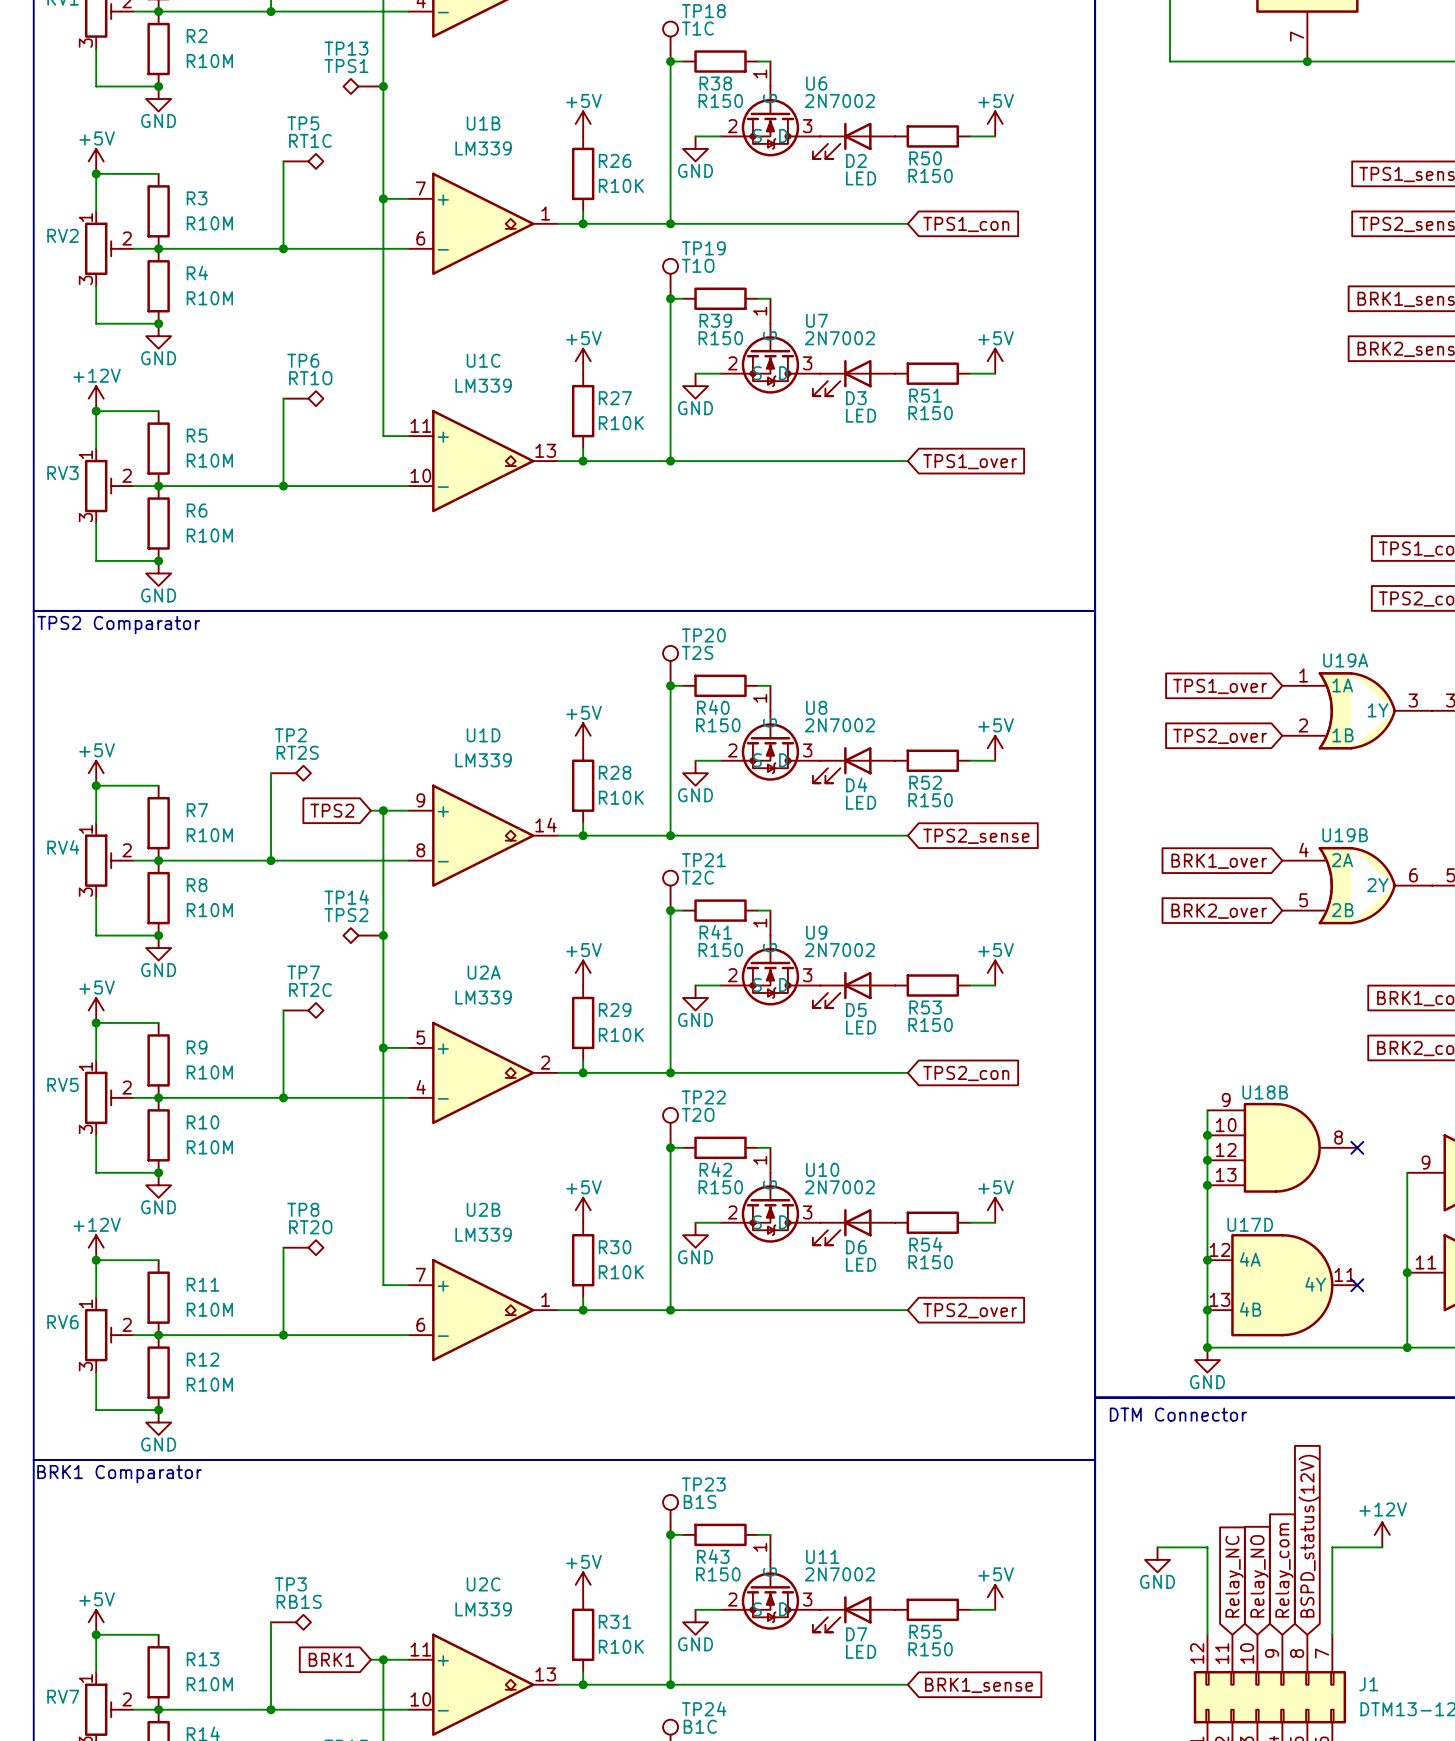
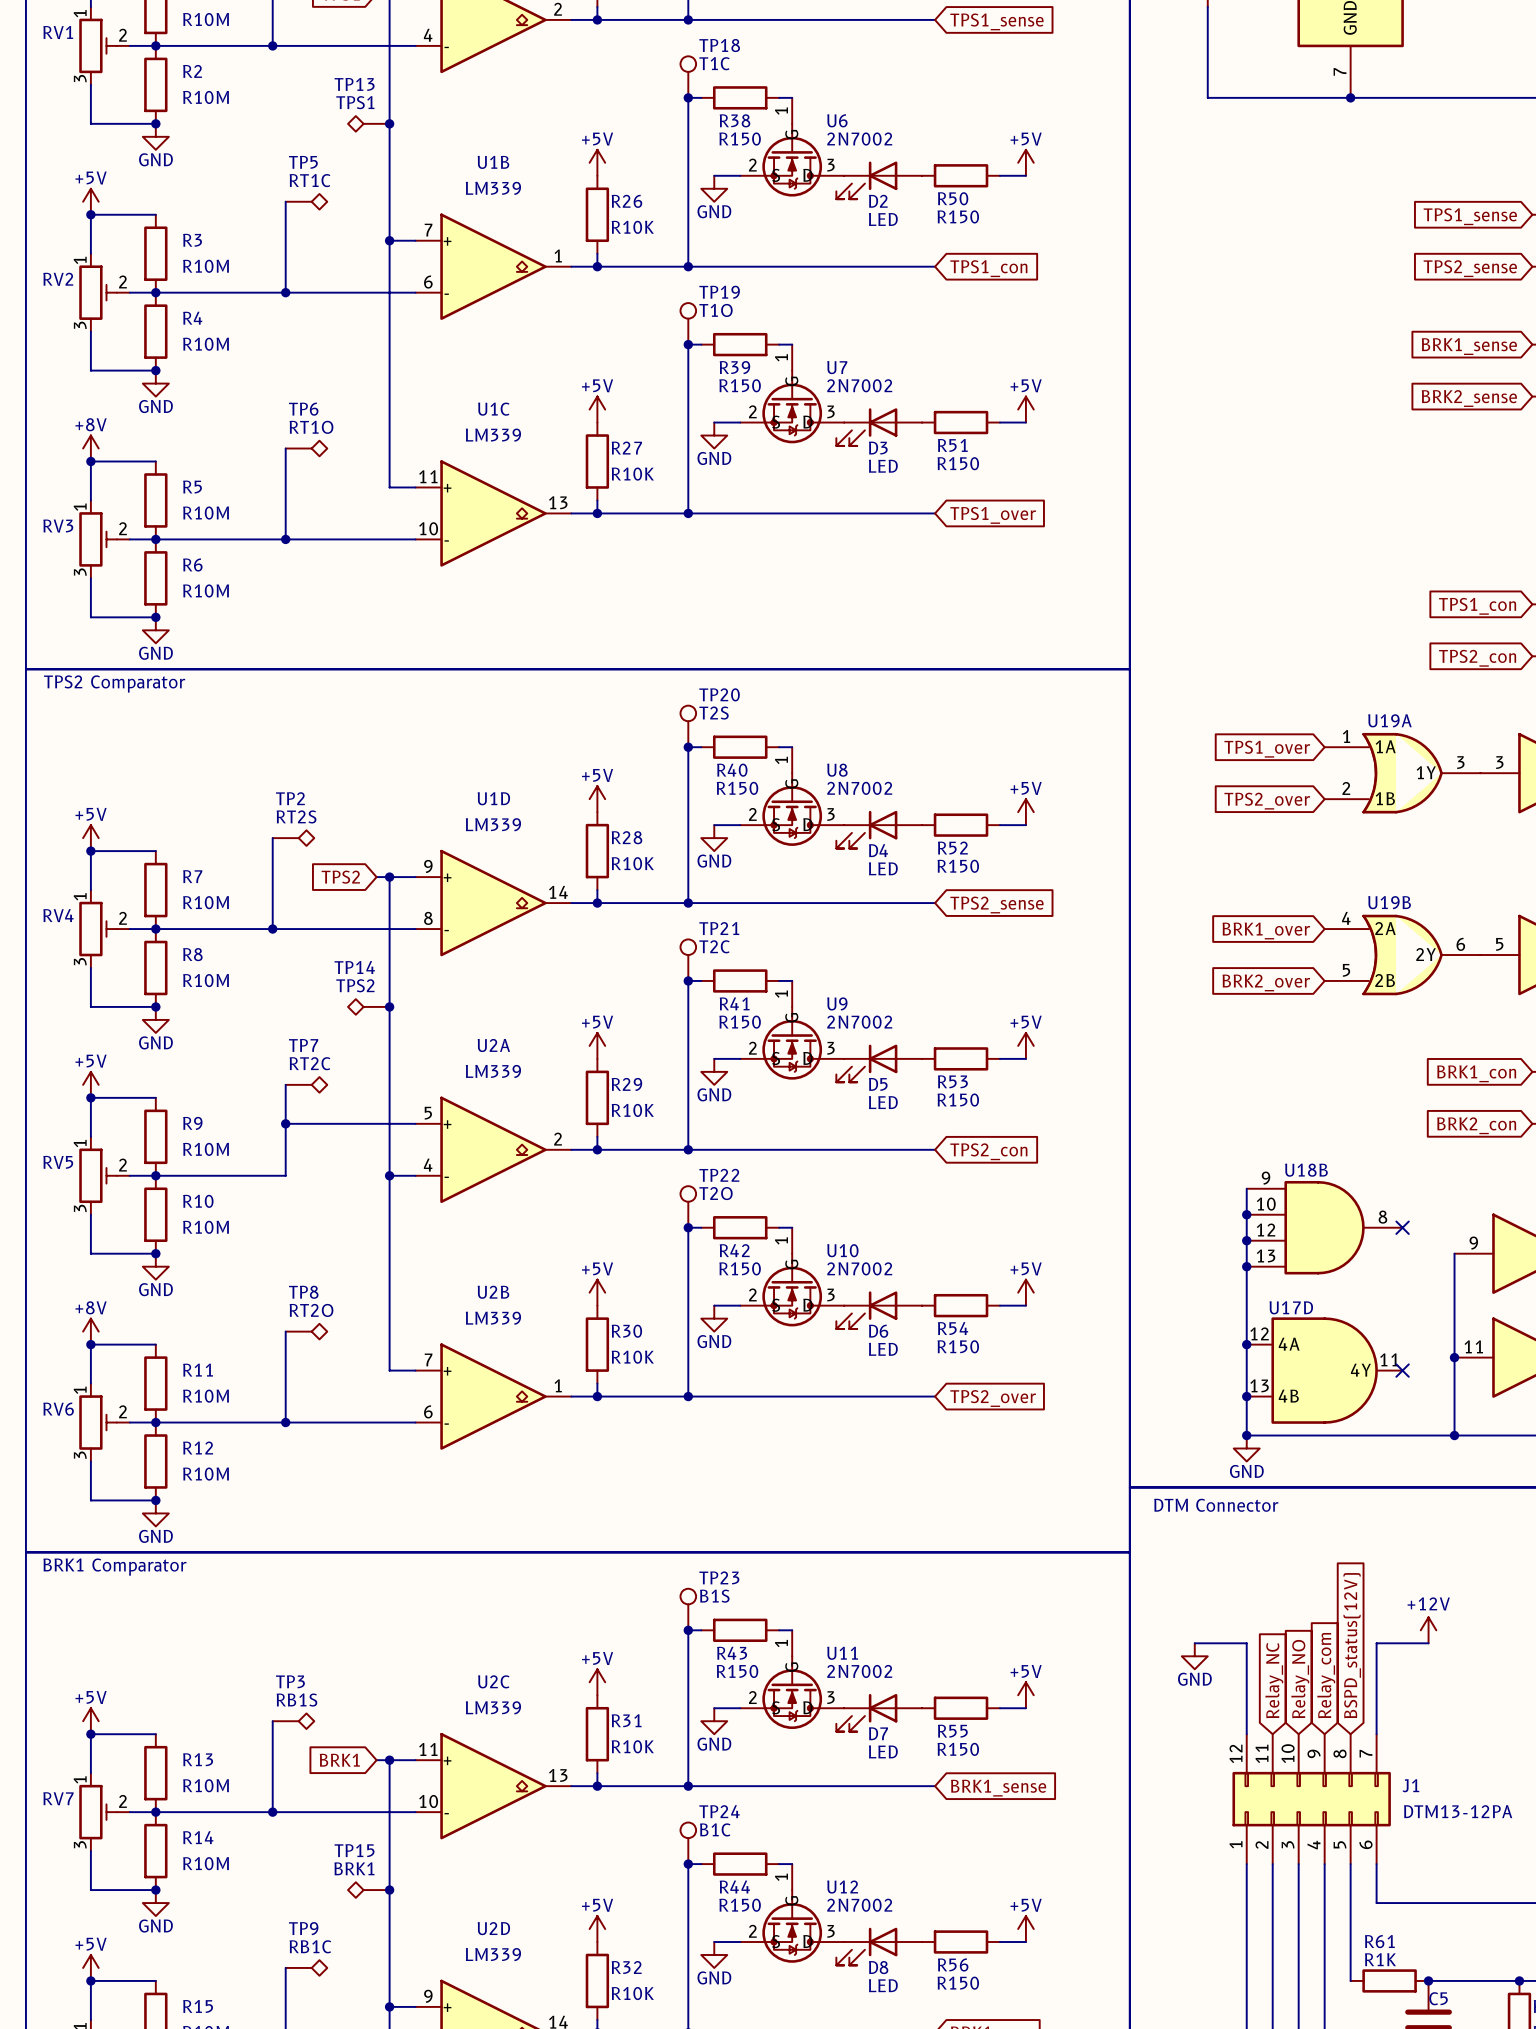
power symbol: +12V (96, 398) -> +8V (90, 448)
junction: none -> (285, 1123)
junction: (383, 1047) -> none
wire: (283, 1097) (383, 1097) -> (285, 1123) (389, 1123)
junction: (283, 1097) -> none
junction: none -> (389, 1175)
power symbol: +12V (96, 1247) -> +8V (90, 1331)

